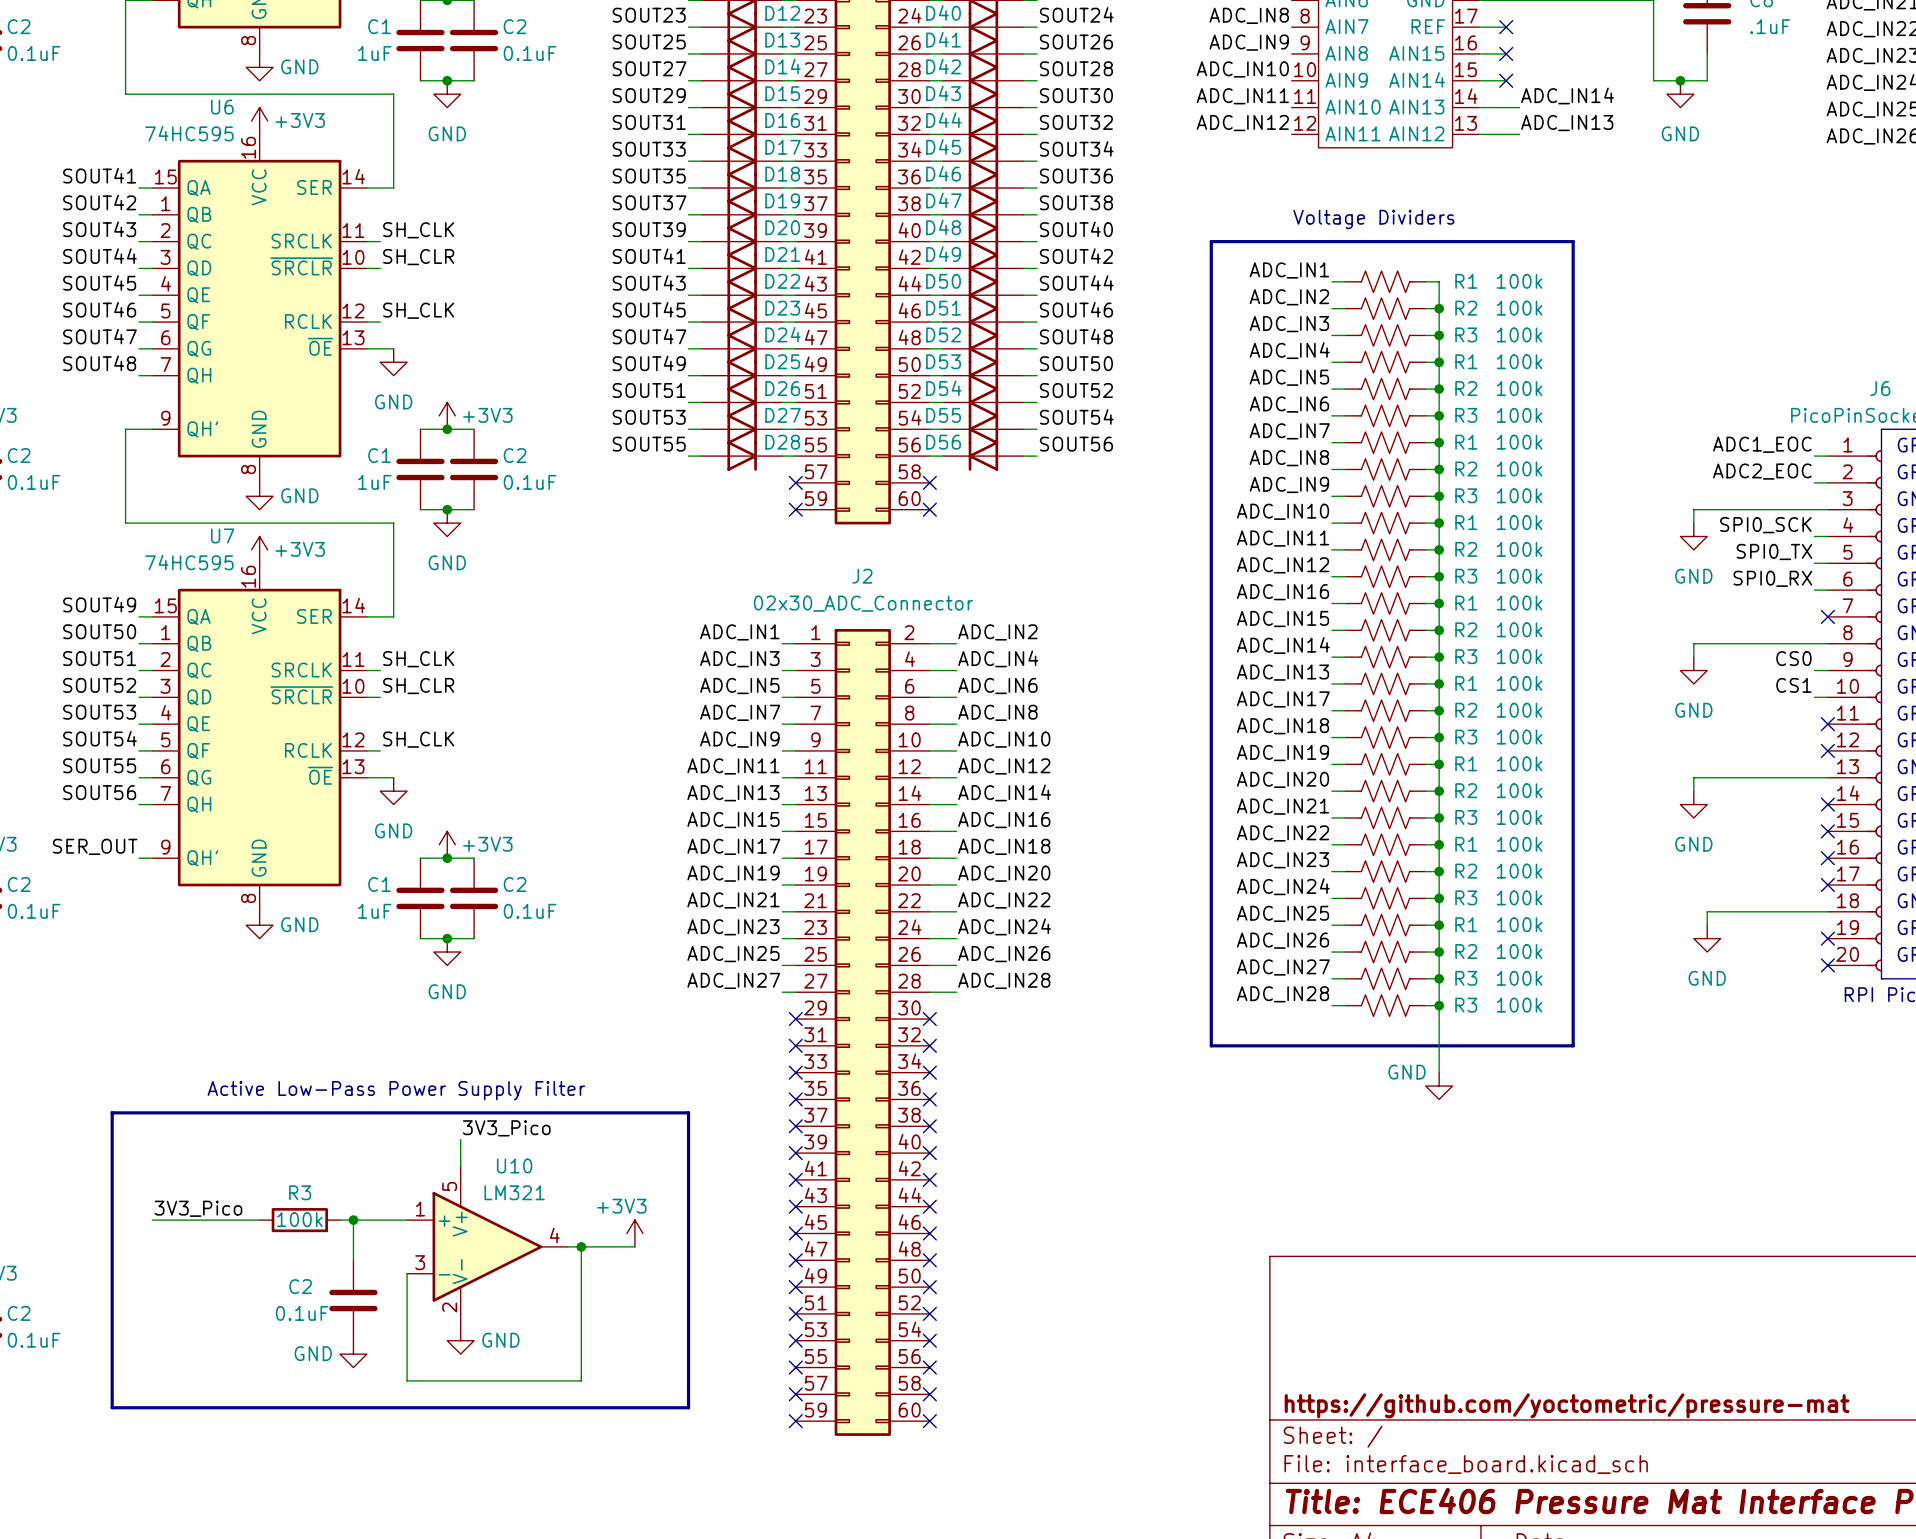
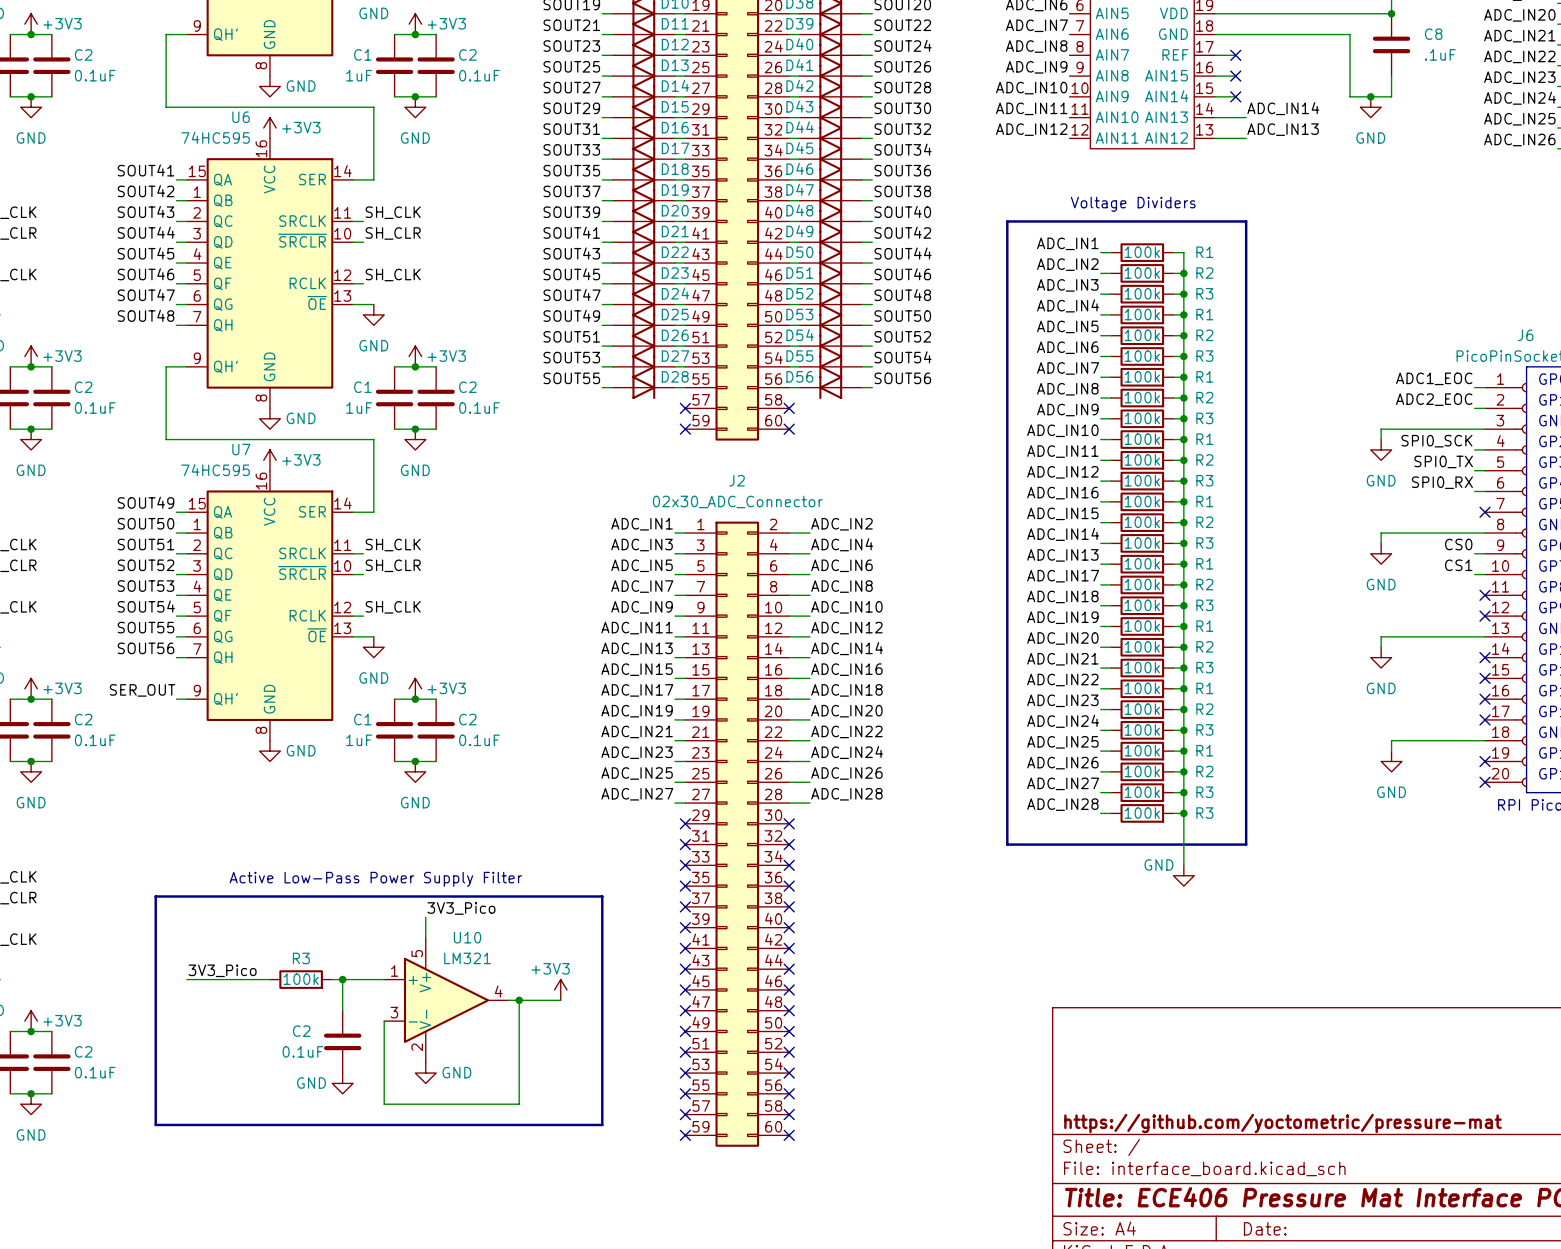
line: (1519, 241) (1573, 241) (1573, 1045) (1519, 1045) -> (1246, 221) (1246, 844)
R1 symbol: [1345, 271, 1426, 293] -> [1111, 243, 1174, 262]
R1 value position: 100k (1519, 281) -> 100k (1142, 252)
R2 symbol: [1345, 297, 1426, 320] -> [1111, 264, 1174, 283]
R2 value position: 100k (1519, 308) -> 100k (1142, 273)
R3 symbol: [1345, 324, 1426, 347] -> [1111, 284, 1174, 304]
R3 value position: 100k (1519, 334) -> 100k (1142, 293)
R1 symbol: [1345, 351, 1426, 373] -> [1111, 305, 1174, 325]
R1 value position: 100k (1519, 361) -> 100k (1142, 314)
R2 symbol: [1345, 378, 1426, 400] -> [1111, 326, 1174, 346]
R2 value position: 100k (1519, 388) -> 100k (1142, 335)
R3 symbol: [1345, 405, 1426, 427] -> [1111, 347, 1174, 366]
R3 value position: 100k (1519, 415) -> 100k (1142, 356)
R1 symbol: [1345, 431, 1426, 454] -> [1111, 367, 1174, 387]
R1 value position: 100k (1519, 442) -> 100k (1142, 376)
R2 symbol: [1345, 458, 1426, 481] -> [1111, 388, 1174, 408]
R2 value position: 100k (1519, 468) -> 100k (1142, 397)
R3 symbol: [1345, 485, 1426, 508] -> [1111, 409, 1174, 429]
R3 value position: 100k (1519, 495) -> 100k (1142, 418)
R1 symbol: [1345, 512, 1426, 534] -> [1111, 430, 1174, 449]
R1 value position: 100k (1519, 522) -> 100k (1142, 439)
R2 symbol: [1345, 539, 1426, 561] -> [1111, 450, 1174, 470]
R2 value position: 100k (1519, 549) -> 100k (1142, 459)
R3 symbol: [1345, 565, 1426, 588] -> [1111, 471, 1174, 491]
R3 value position: 100k (1519, 576) -> 100k (1142, 480)
R1 symbol: [1345, 592, 1426, 615] -> [1111, 492, 1174, 512]
R1 value position: 100k (1519, 603) -> 100k (1142, 501)
R2 symbol: [1345, 619, 1426, 642] -> [1111, 513, 1174, 532]
R2 value position: 100k (1519, 629) -> 100k (1142, 522)
R3 symbol: [1345, 646, 1426, 668] -> [1111, 534, 1174, 553]
R3 value position: 100k (1519, 656) -> 100k (1142, 543)
R1 symbol: [1345, 673, 1426, 695] -> [1111, 554, 1174, 574]
R1 value position: 100k (1519, 683) -> 100k (1142, 563)
R2 symbol: [1345, 700, 1426, 722] -> [1111, 575, 1174, 595]
R2 value position: 100k (1519, 710) -> 100k (1142, 584)
R3 symbol: [1345, 726, 1426, 749] -> [1111, 596, 1174, 616]
R3 value position: 100k (1519, 737) -> 100k (1142, 605)
R1 symbol: [1345, 753, 1426, 776] -> [1111, 617, 1174, 636]
R1 value position: 100k (1519, 763) -> 100k (1142, 626)
R2 symbol: [1345, 780, 1426, 802] -> [1111, 637, 1174, 657]
R2 value position: 100k (1519, 790) -> 100k (1142, 646)
R3 symbol: [1345, 807, 1426, 829] -> [1111, 658, 1174, 678]
R3 value position: 100k (1519, 817) -> 100k (1142, 667)
R1 symbol: [1345, 834, 1426, 856] -> [1111, 679, 1174, 699]
R1 value position: 100k (1519, 844) -> 100k (1142, 688)
R2 symbol: [1345, 860, 1426, 883] -> [1111, 700, 1174, 719]
R2 value position: 100k (1519, 871) -> 100k (1142, 709)
R3 symbol: [1345, 887, 1426, 910] -> [1111, 720, 1174, 740]
R3 value position: 100k (1519, 897) -> 100k (1142, 729)
R1 symbol: [1345, 914, 1426, 936] -> [1111, 741, 1174, 761]
R1 value position: 100k (1519, 924) -> 100k (1142, 750)
R2 symbol: [1345, 941, 1426, 963] -> [1111, 762, 1174, 782]
R2 value position: 100k (1519, 951) -> 100k (1142, 771)
R3 symbol: [1345, 968, 1426, 990] -> [1111, 783, 1174, 802]
R3 value position: 100k (1519, 978) -> 100k (1142, 792)
R3 symbol: [1345, 994, 1426, 1017] -> [1111, 804, 1174, 823]
R3 value position: 100k (1519, 1005) -> 100k (1142, 813)

